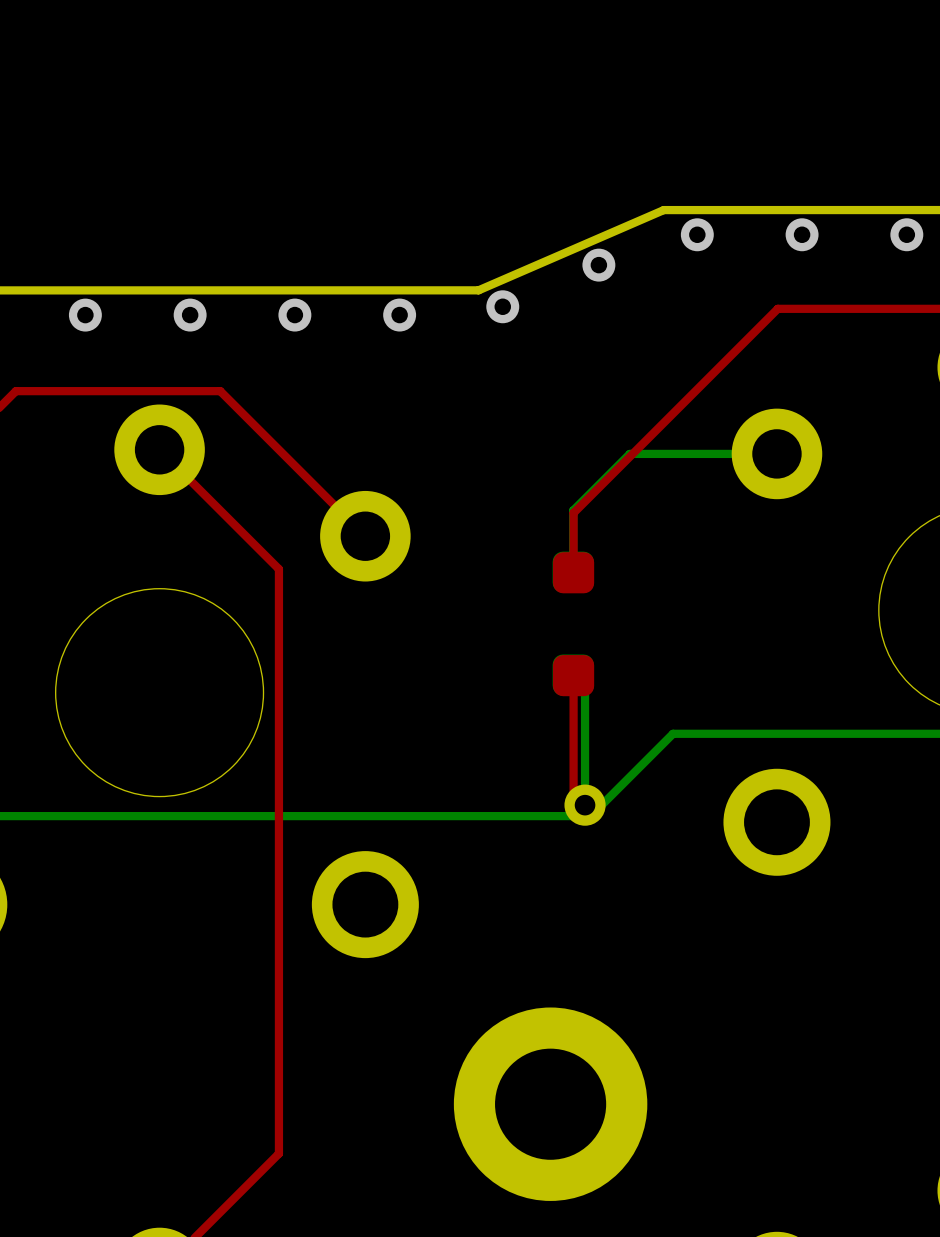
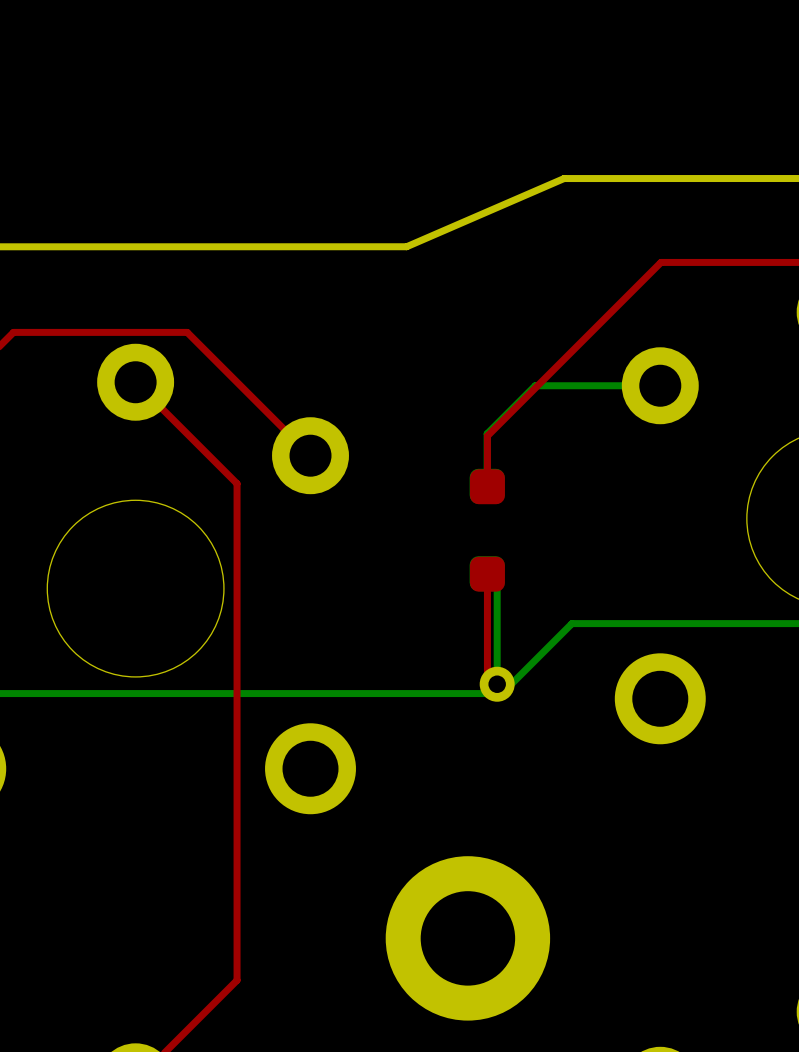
via: (697, 234) -> none
via: (802, 234) -> none
via: (906, 234) -> none
via: (598, 265) -> none
via: (502, 306) -> none
via: (85, 315) -> none
via: (190, 315) -> none
via: (294, 315) -> none
via: (399, 315) -> none

